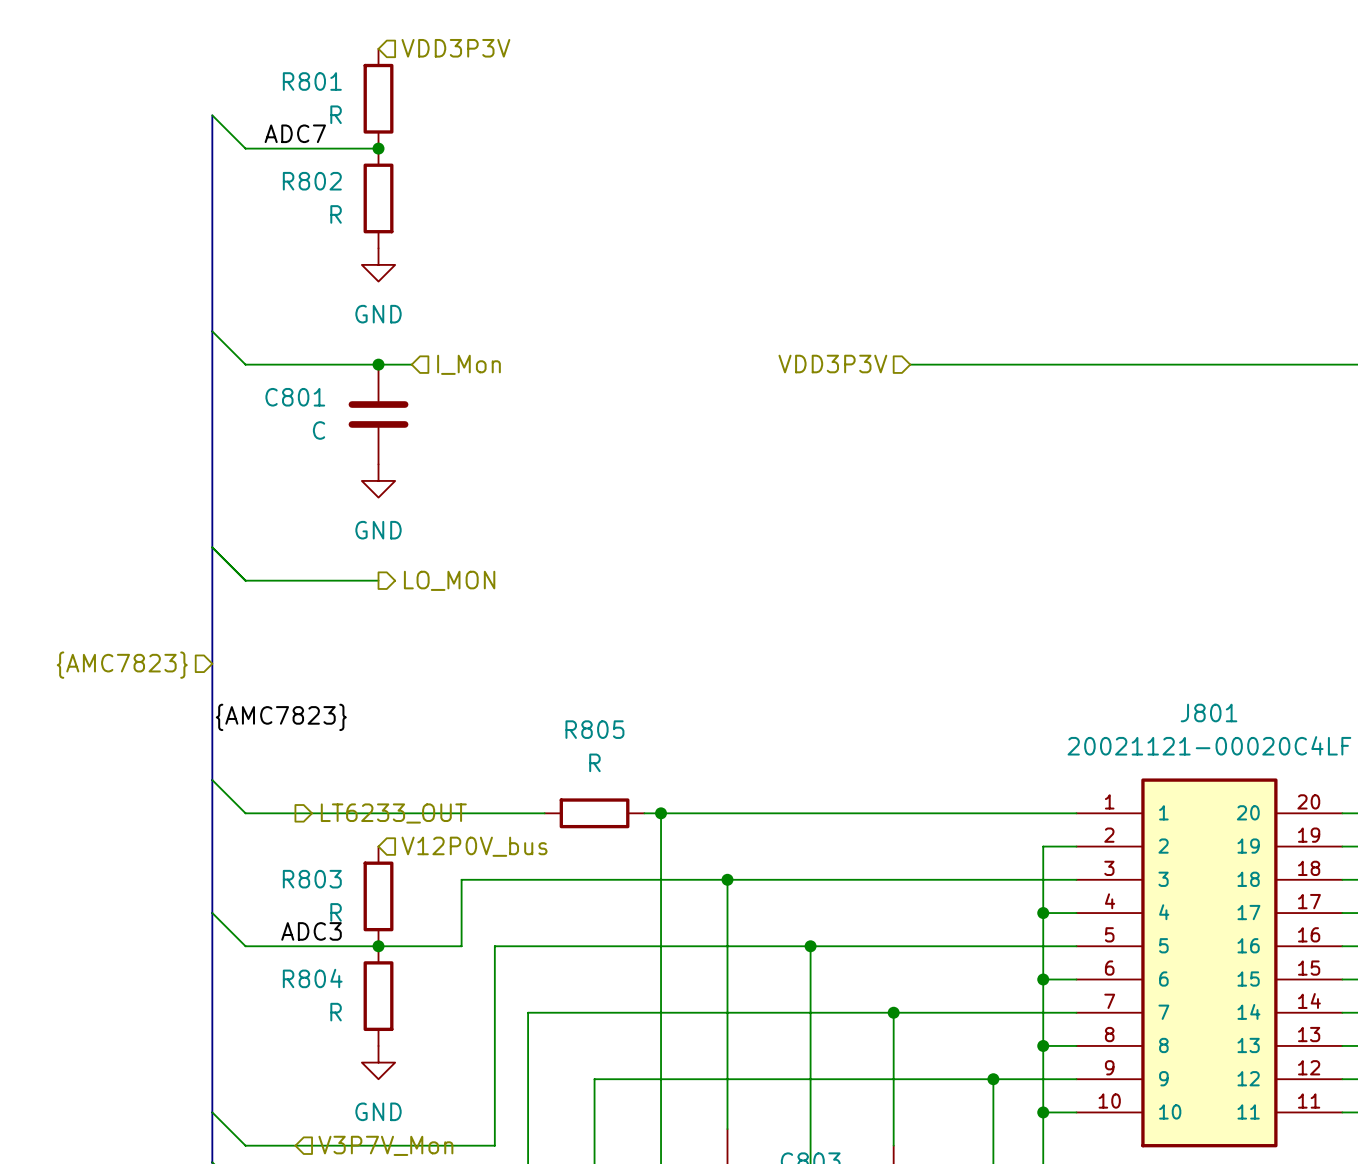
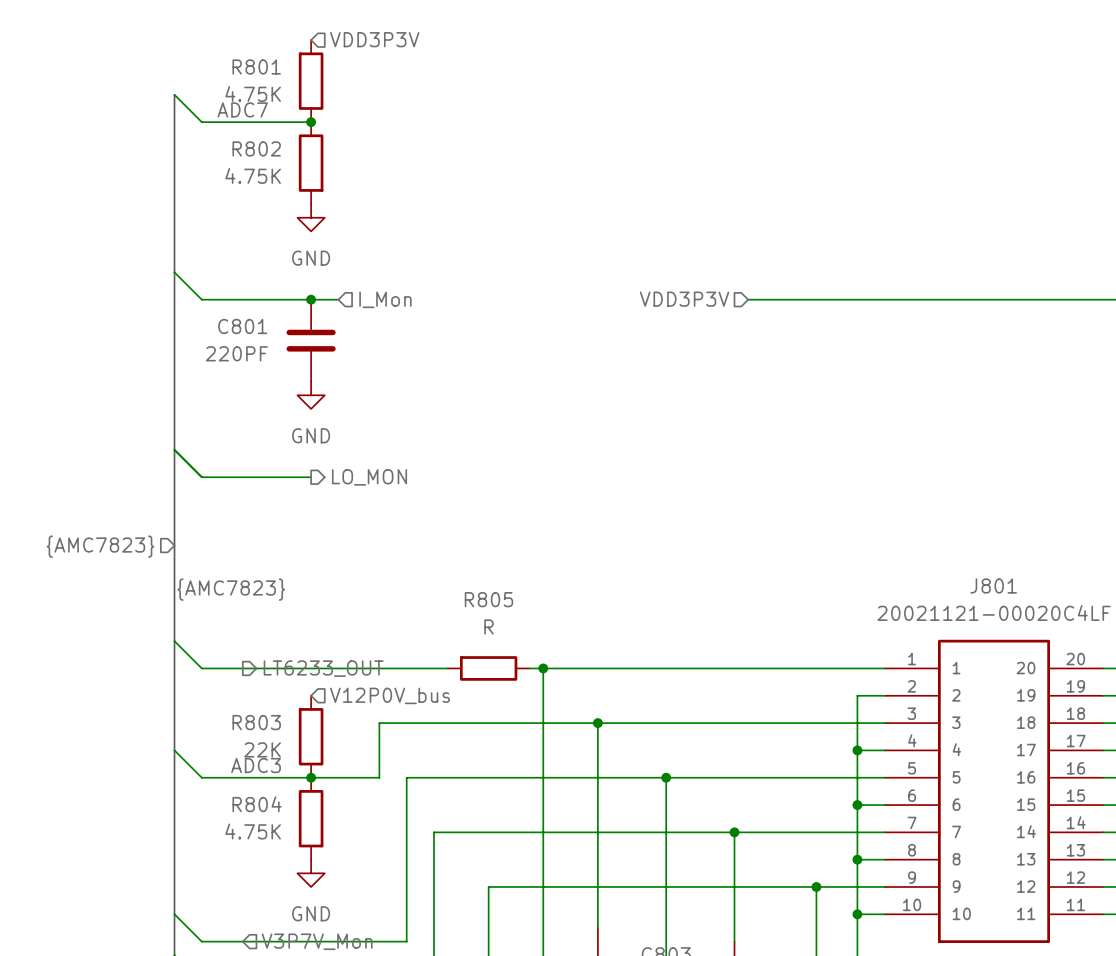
R801 value: R (336, 114) -> 4.75K (253, 93)
R802 value: R (336, 214) -> 4.75K (253, 175)
C801 value: C (319, 430) -> 220PF (236, 353)
R803 value: R (336, 912) -> 22K (262, 749)
R804 value: R (336, 1012) -> 4.75K (253, 831)

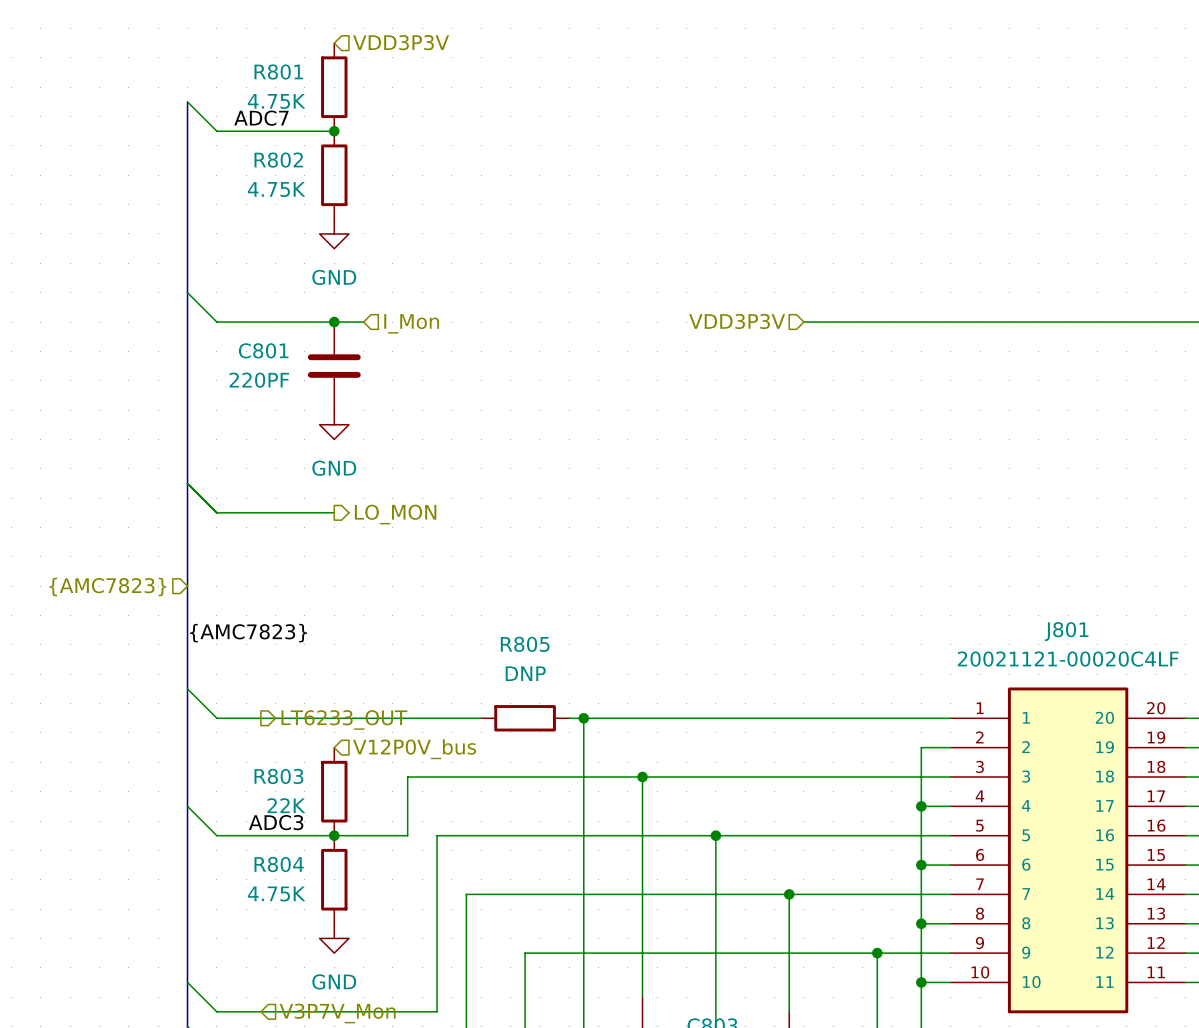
R805 value: R (488, 626) -> DNP (525, 673)

